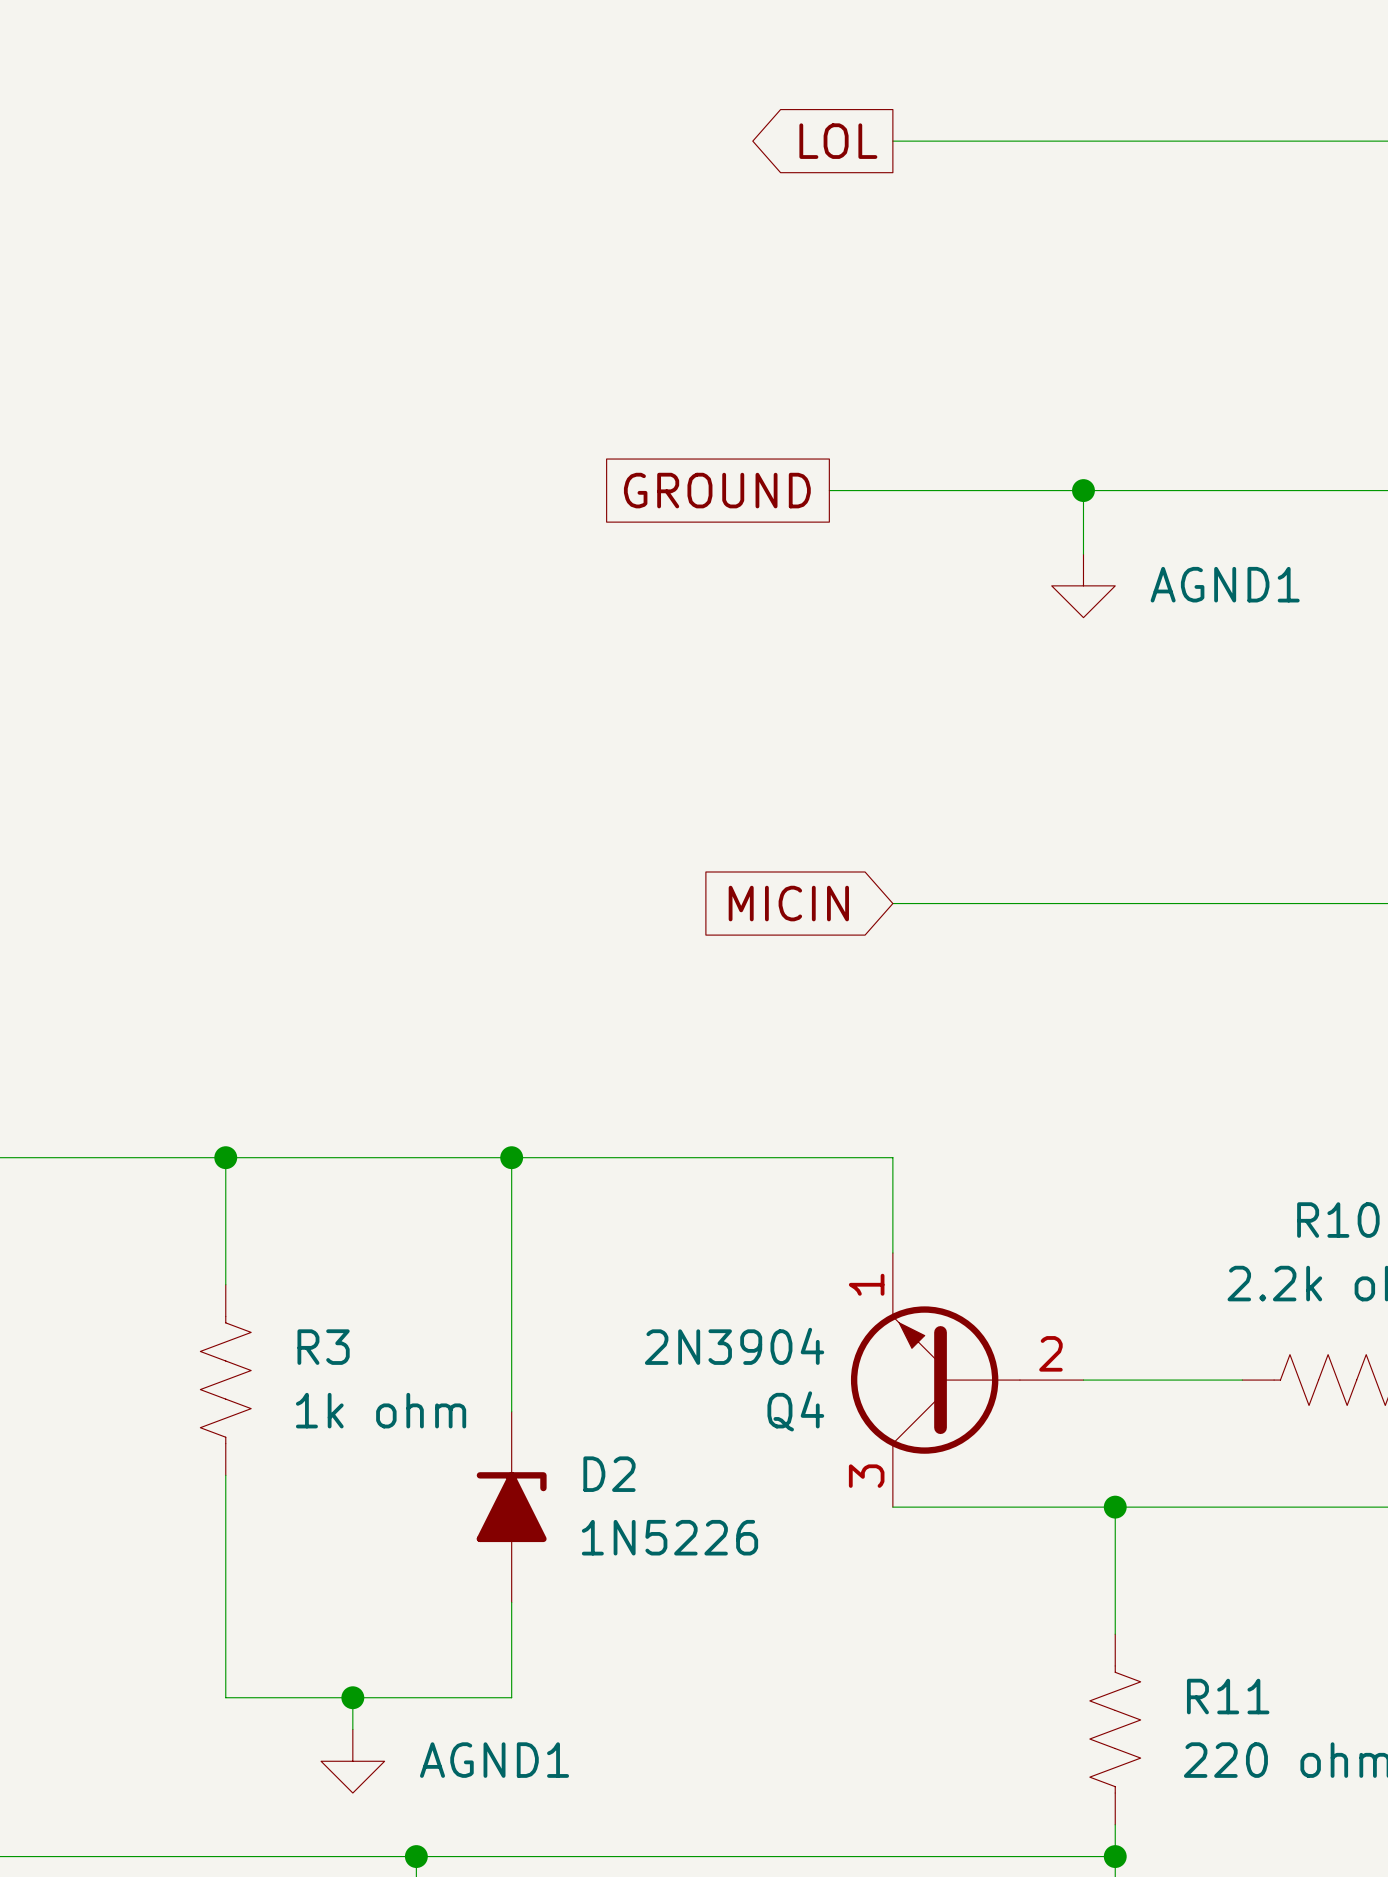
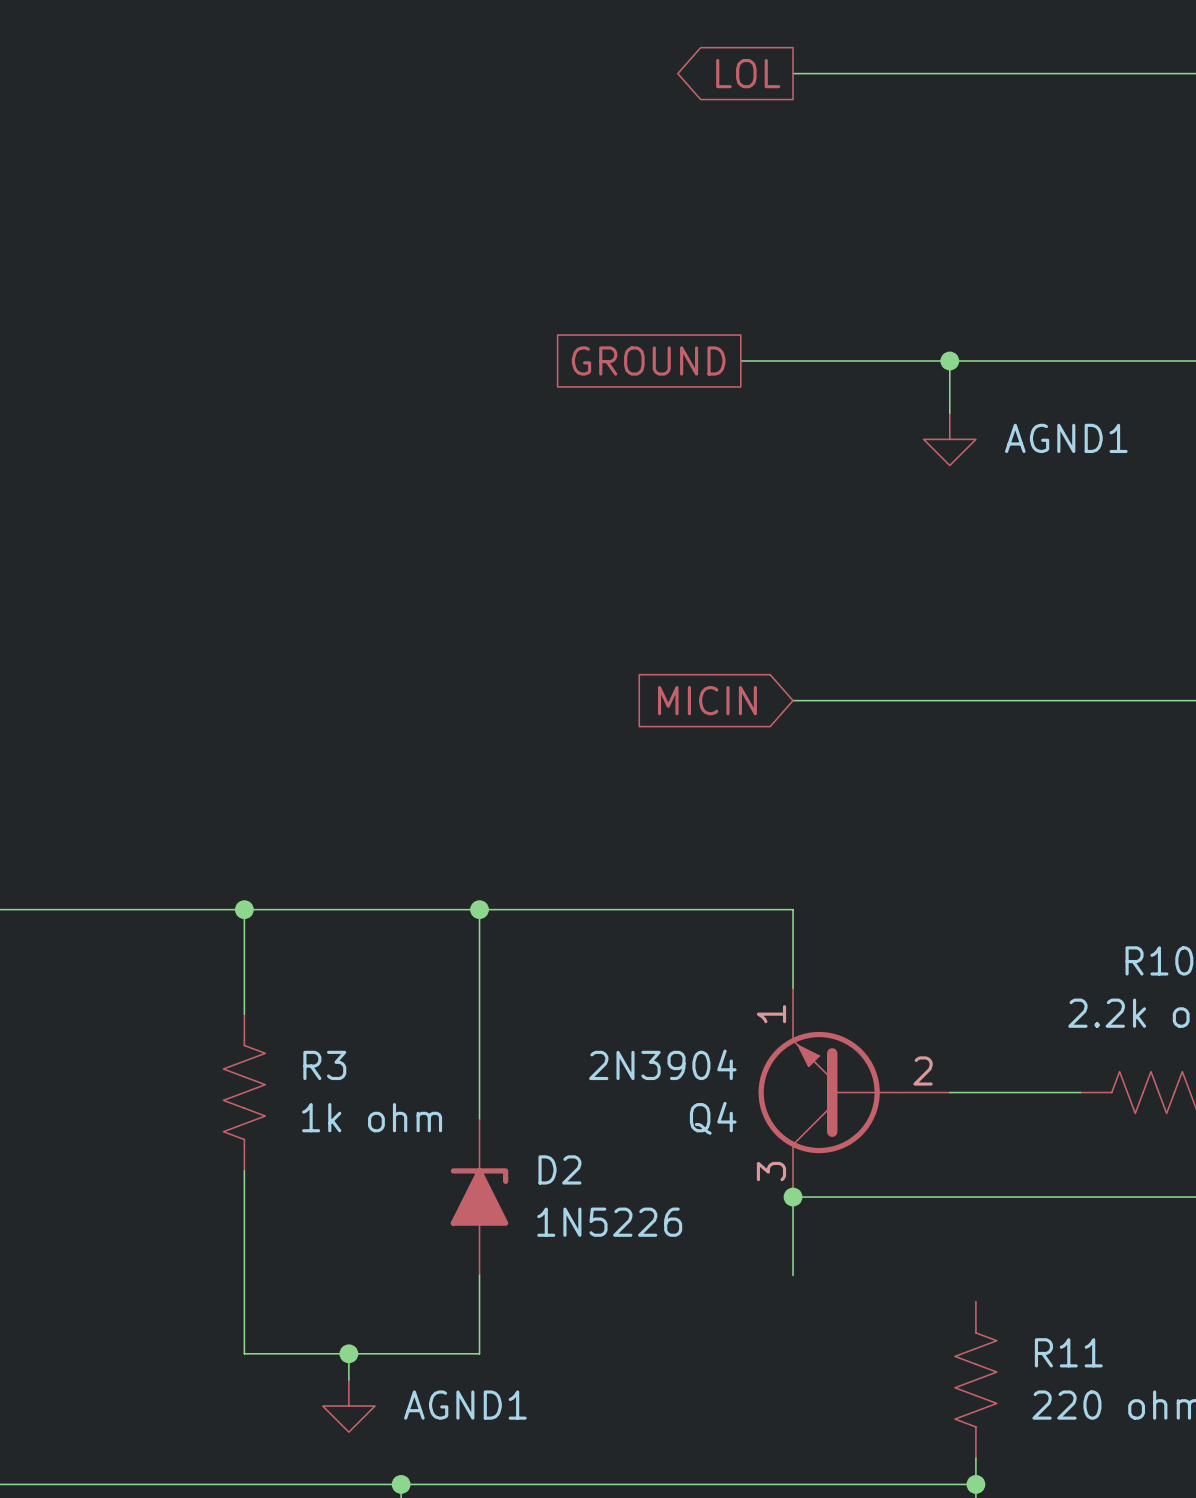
wire: none -> (793, 1197) (793, 1275)
junction: none -> (793, 1197)
wire: (1115, 1507) (1115, 1634) -> none
junction: (1115, 1507) -> none

